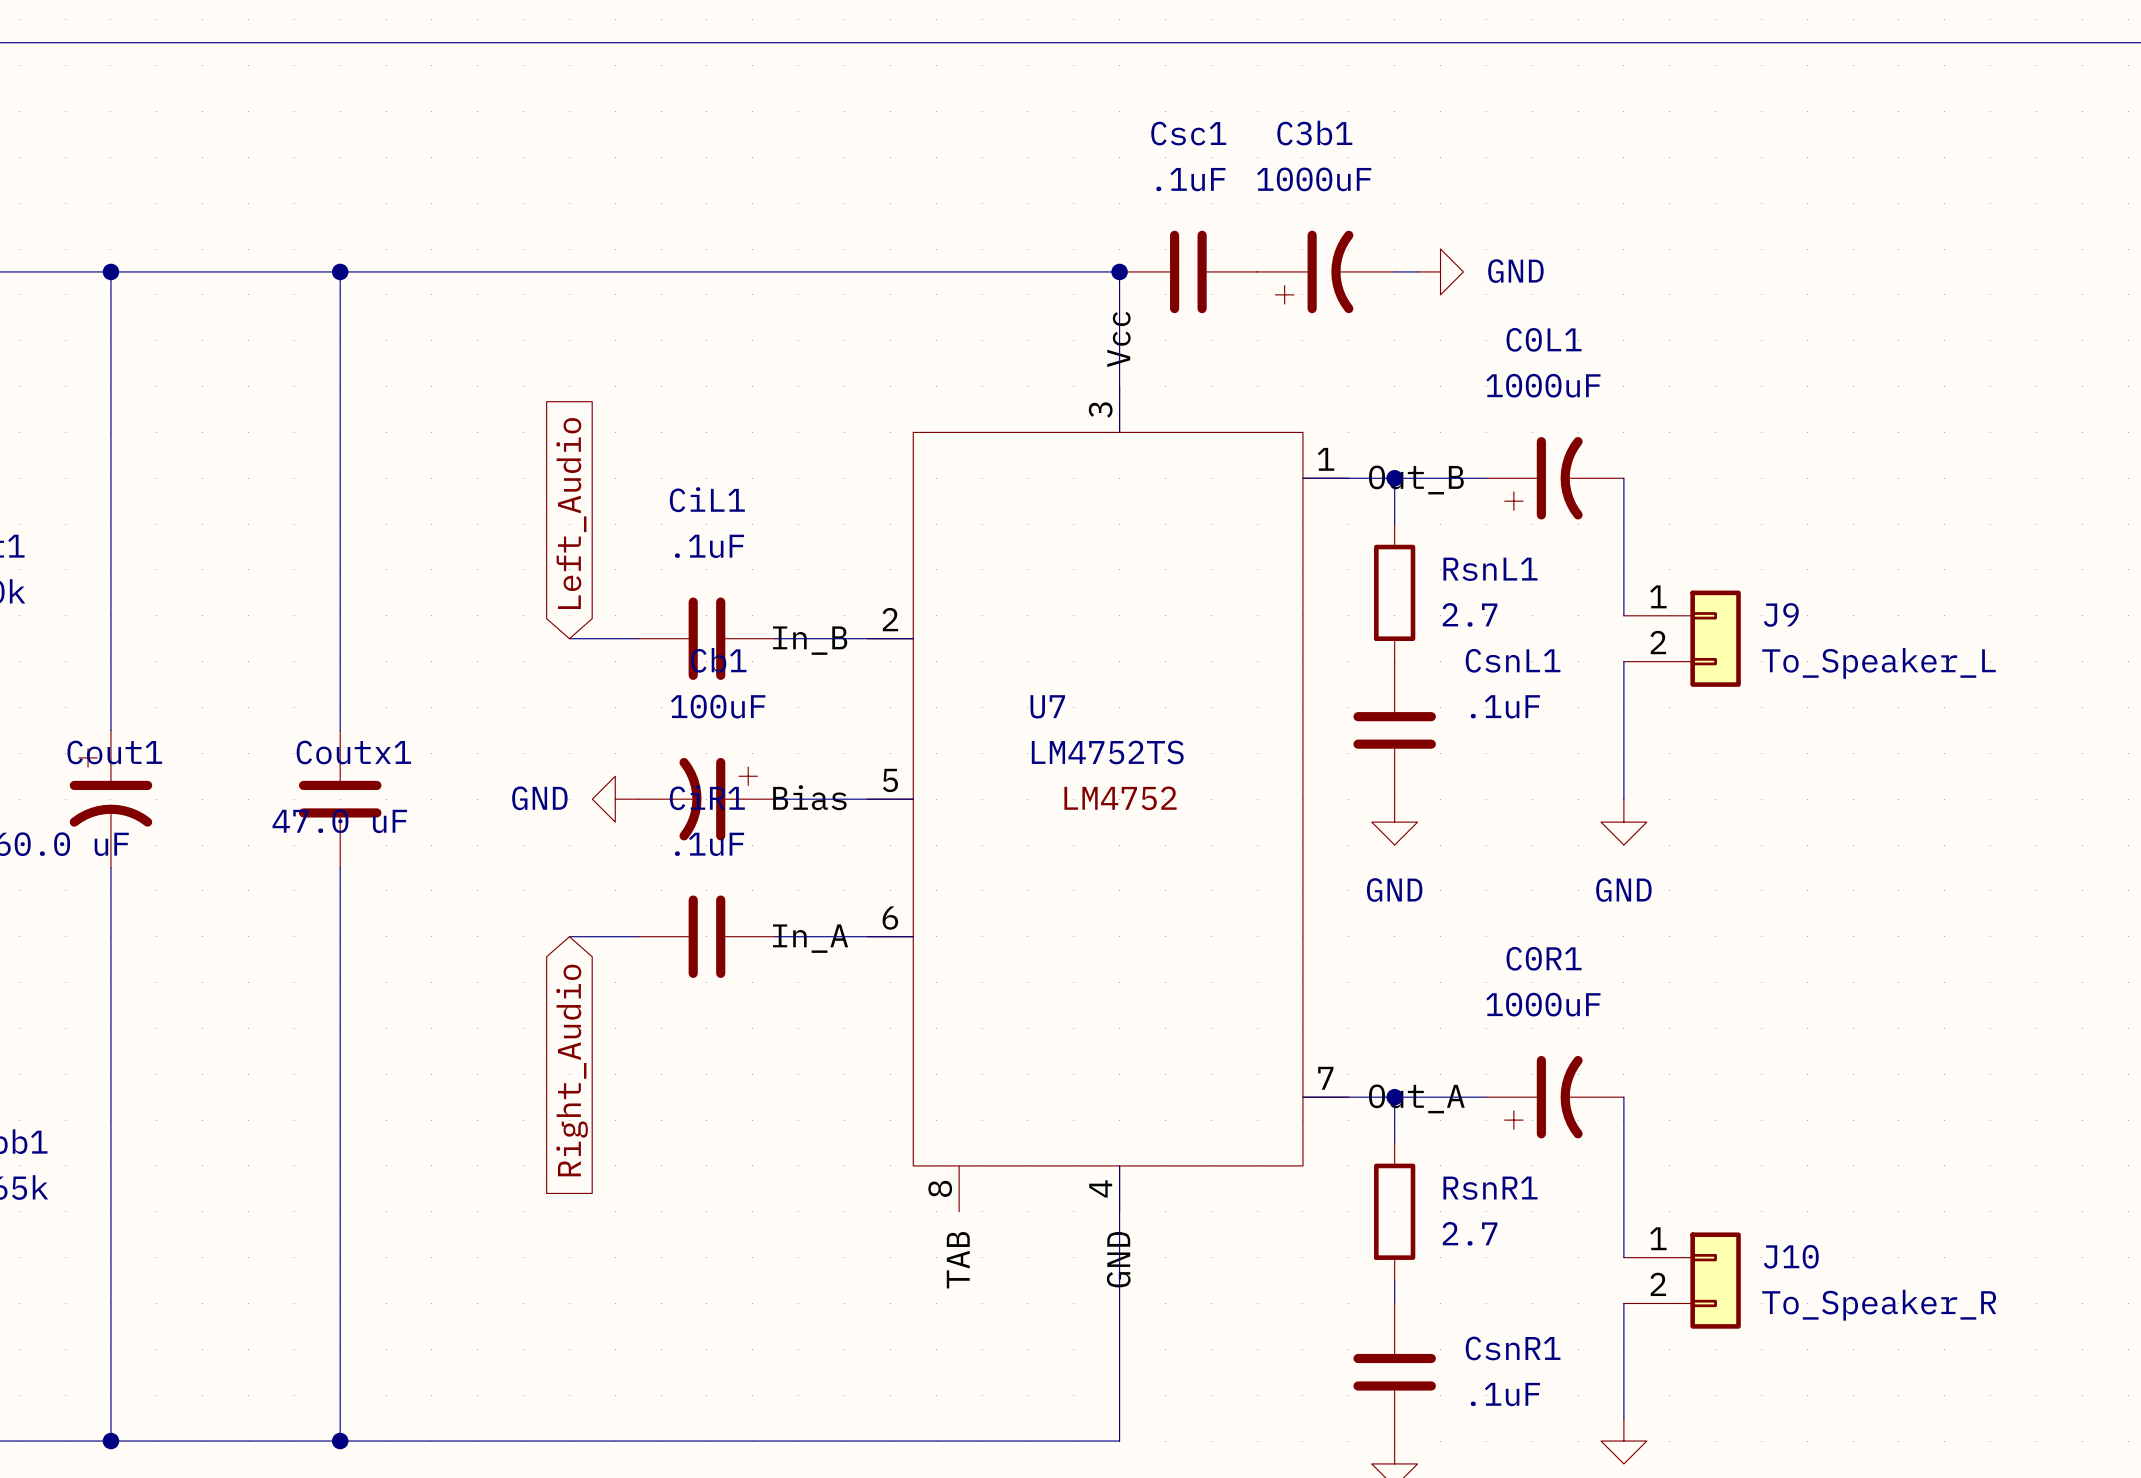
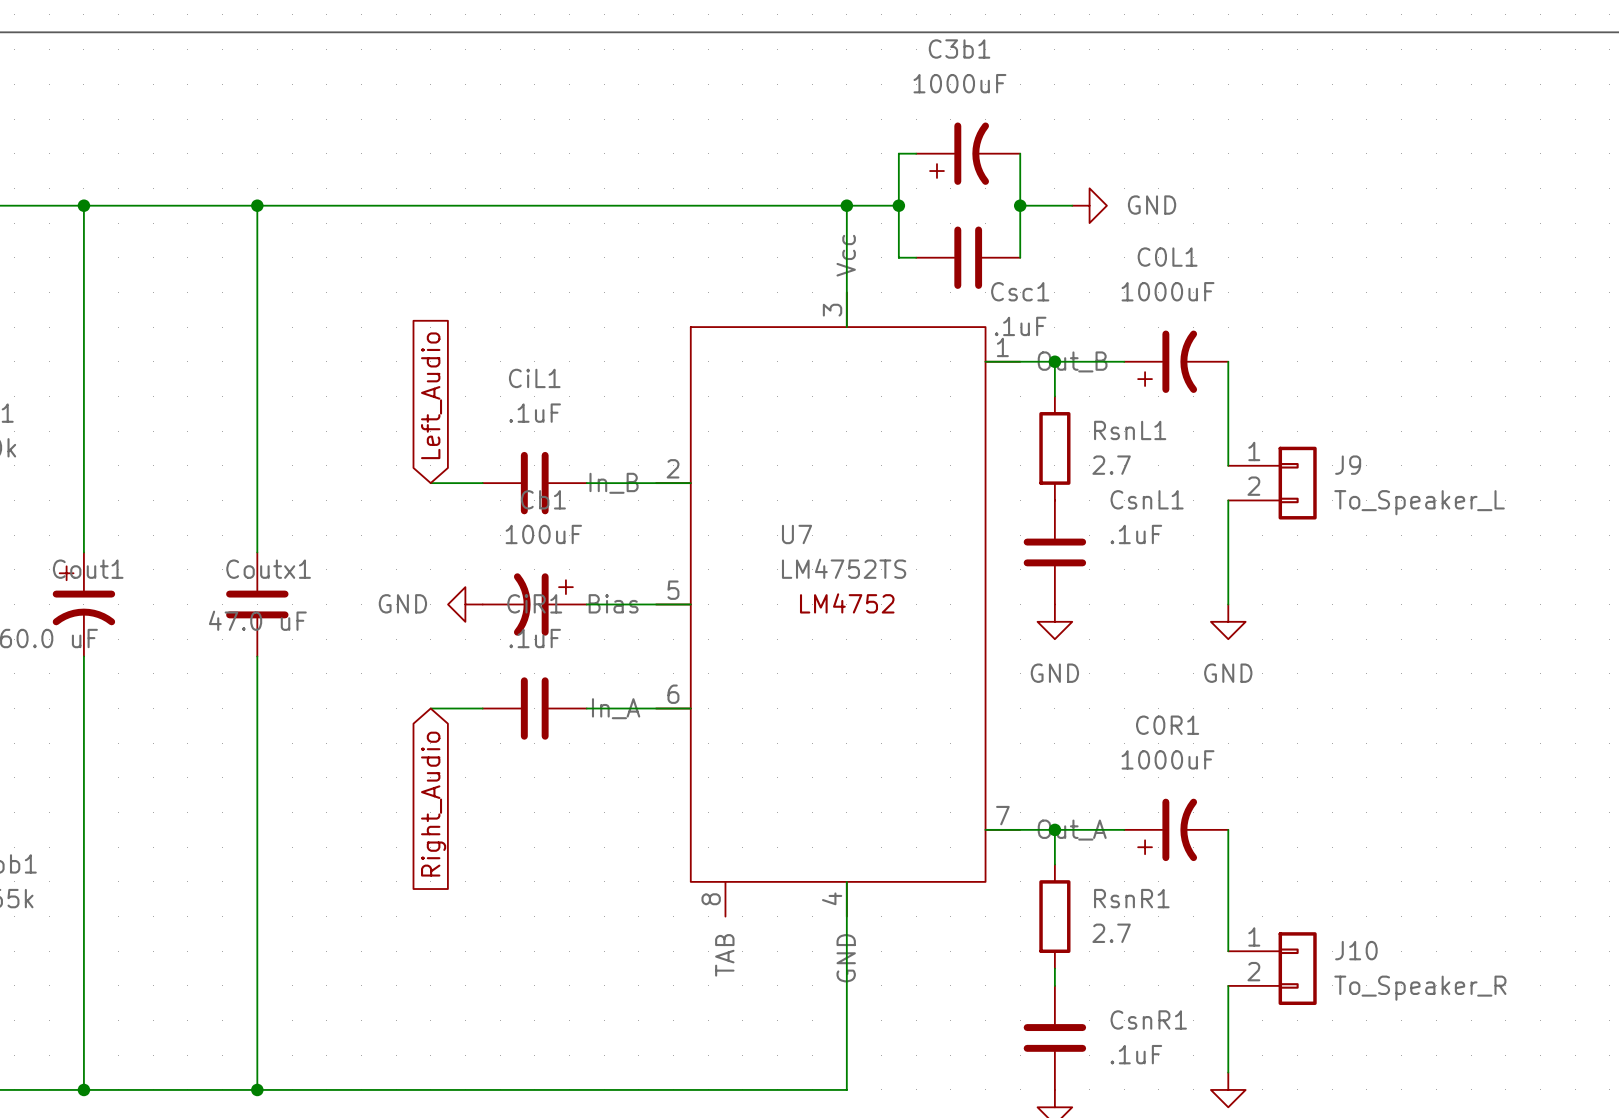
Csc1 name position: Csc1 (1188, 133) -> Csc1 (1020, 291)
Csc1 value position: .1uF (1190, 179) -> .1uF (1020, 326)
wire: none -> (916, 153) (898, 153) (898, 257) (916, 257)
wire: none -> (1020, 153) (1020, 257)
Csc1 position: (1188, 271) -> (968, 257)
junction: none -> (898, 205)
C3b1 position: (1325, 271) -> (968, 153)
junction: none -> (1020, 205)

